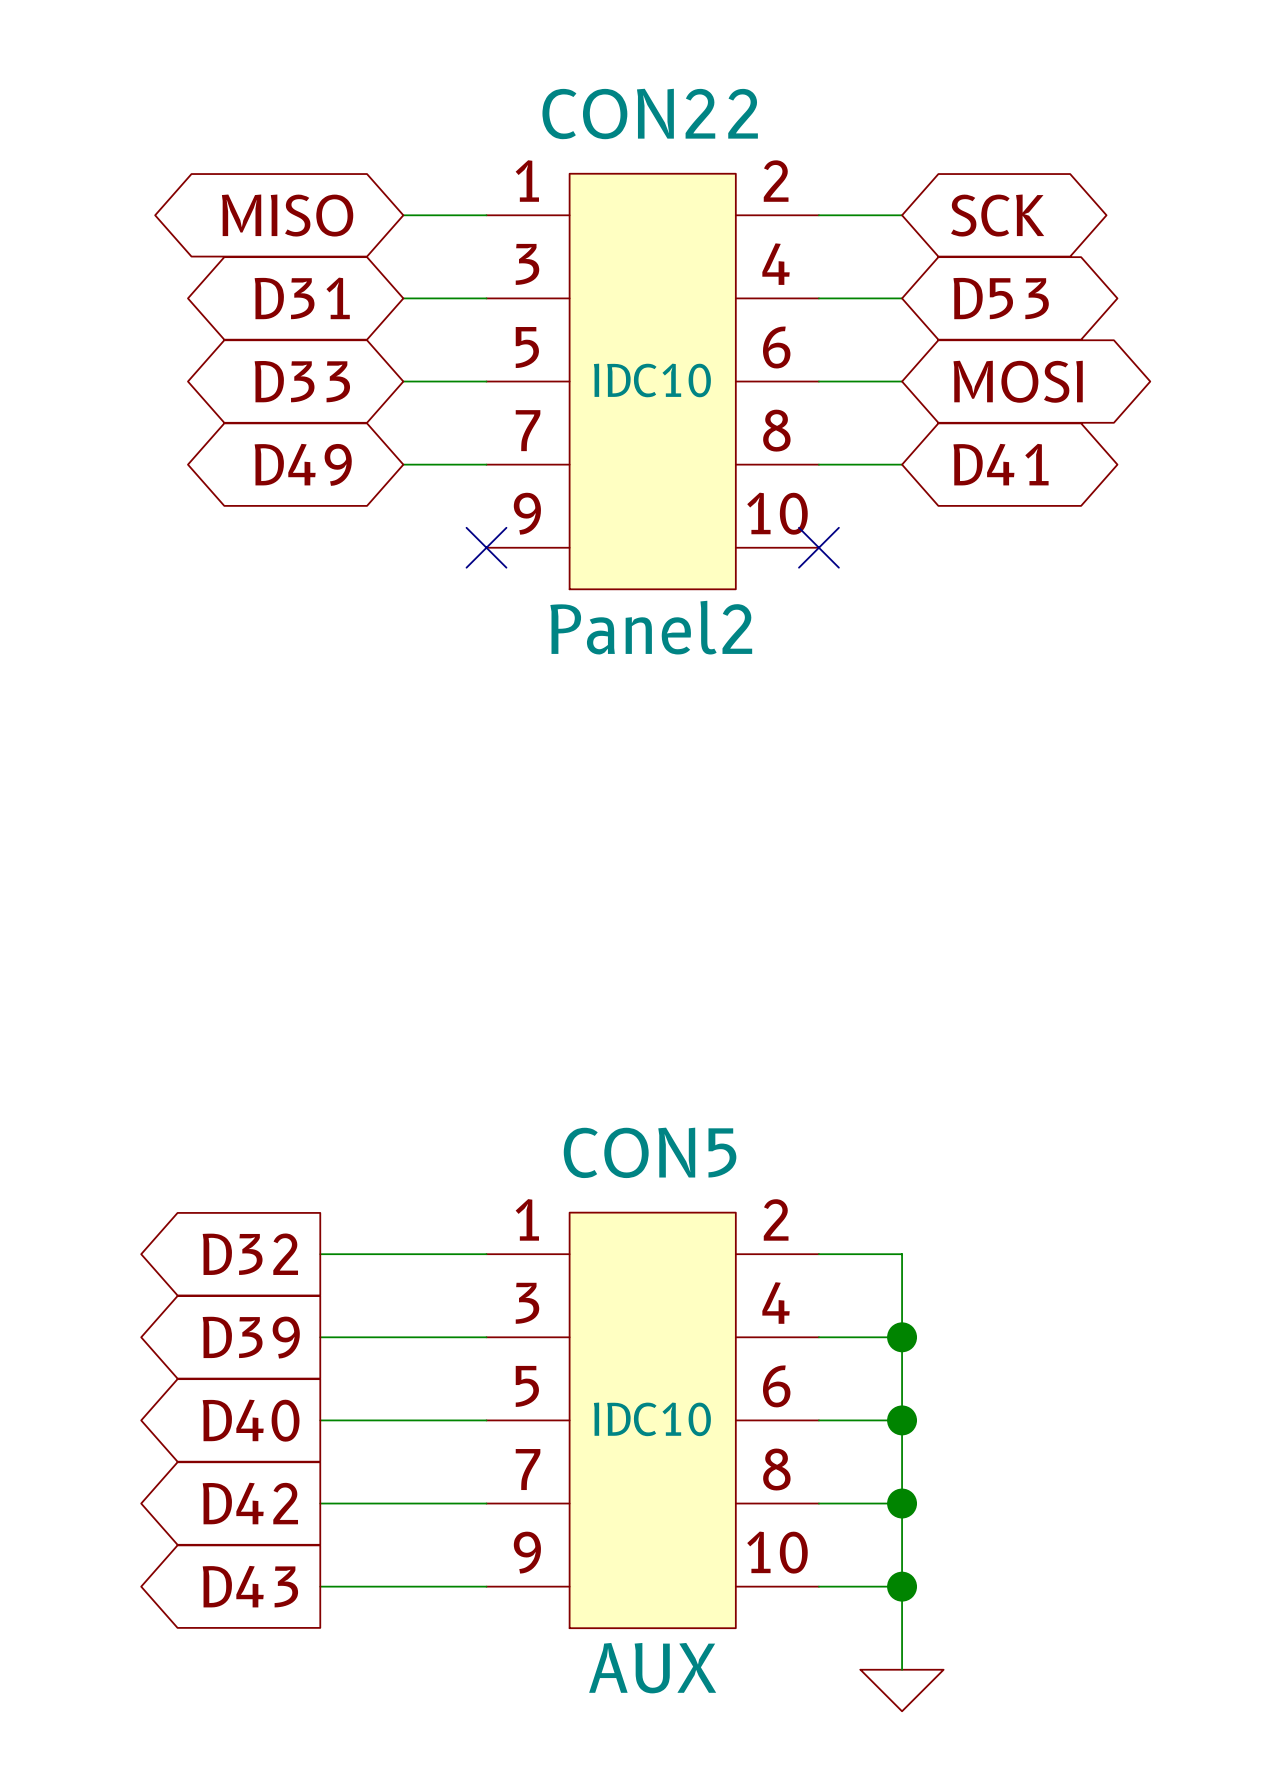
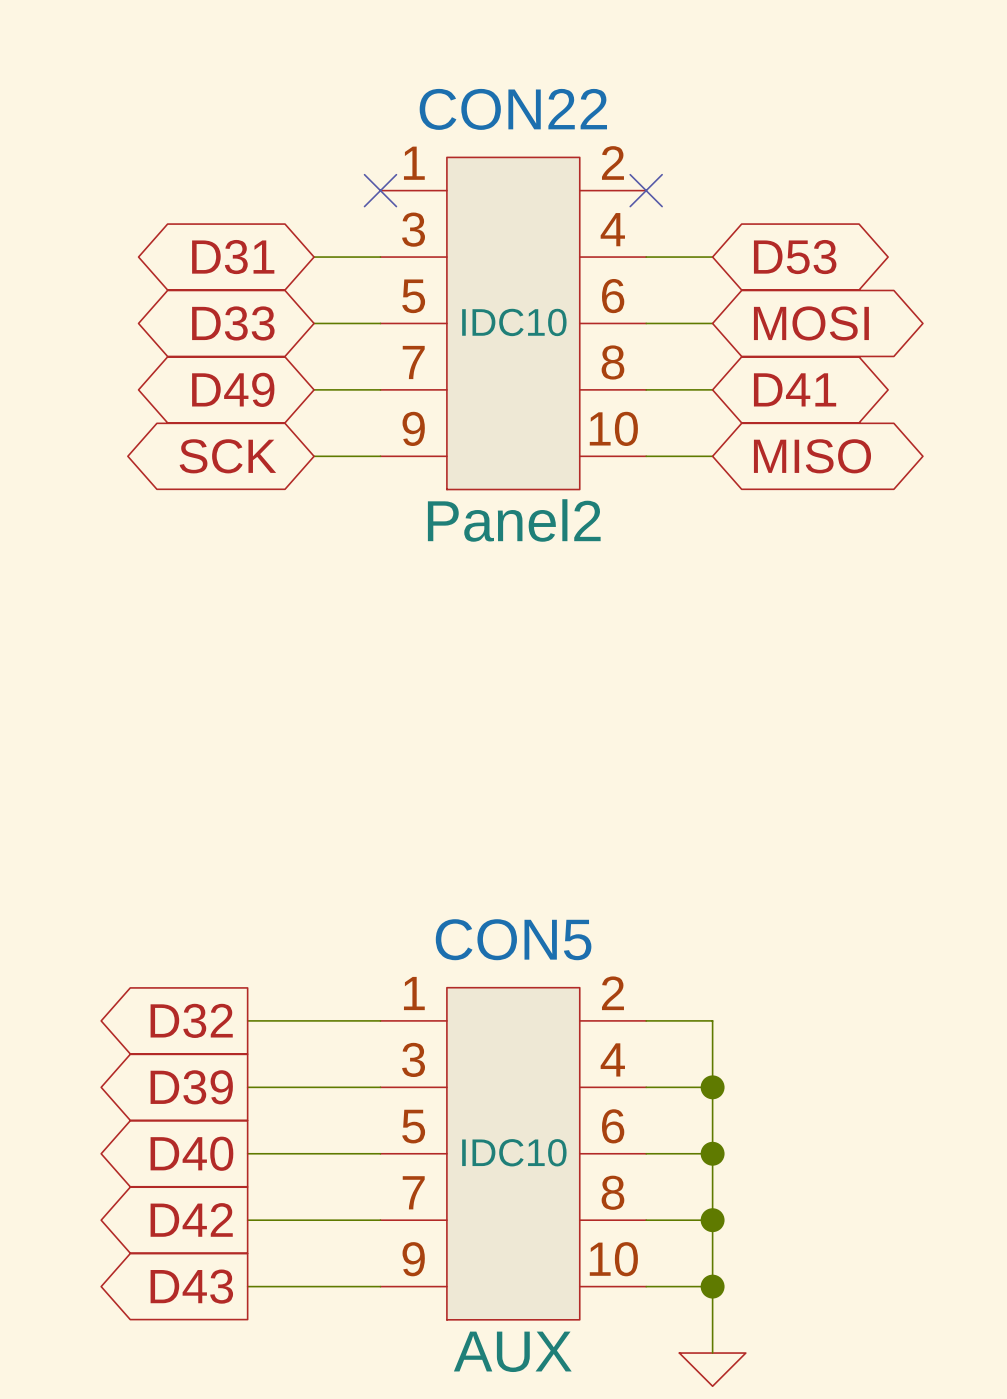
global label rotation: 0° (287, 215) -> 180° (812, 456)
global label position: MISO (287, 215) -> MISO (812, 456)
wire: (403, 215) (486, 215) -> (314, 456) (380, 456)
no-connect mark: none -> (380, 190)
wire: (818, 215) (902, 215) -> (646, 456) (712, 456)
no-connect mark: none -> (646, 190)
global label rotation: 0° (997, 215) -> 180° (227, 456)
global label position: SCK (997, 215) -> SCK (227, 456)
no-connect mark: (486, 547) -> none
no-connect mark: (818, 547) -> none

